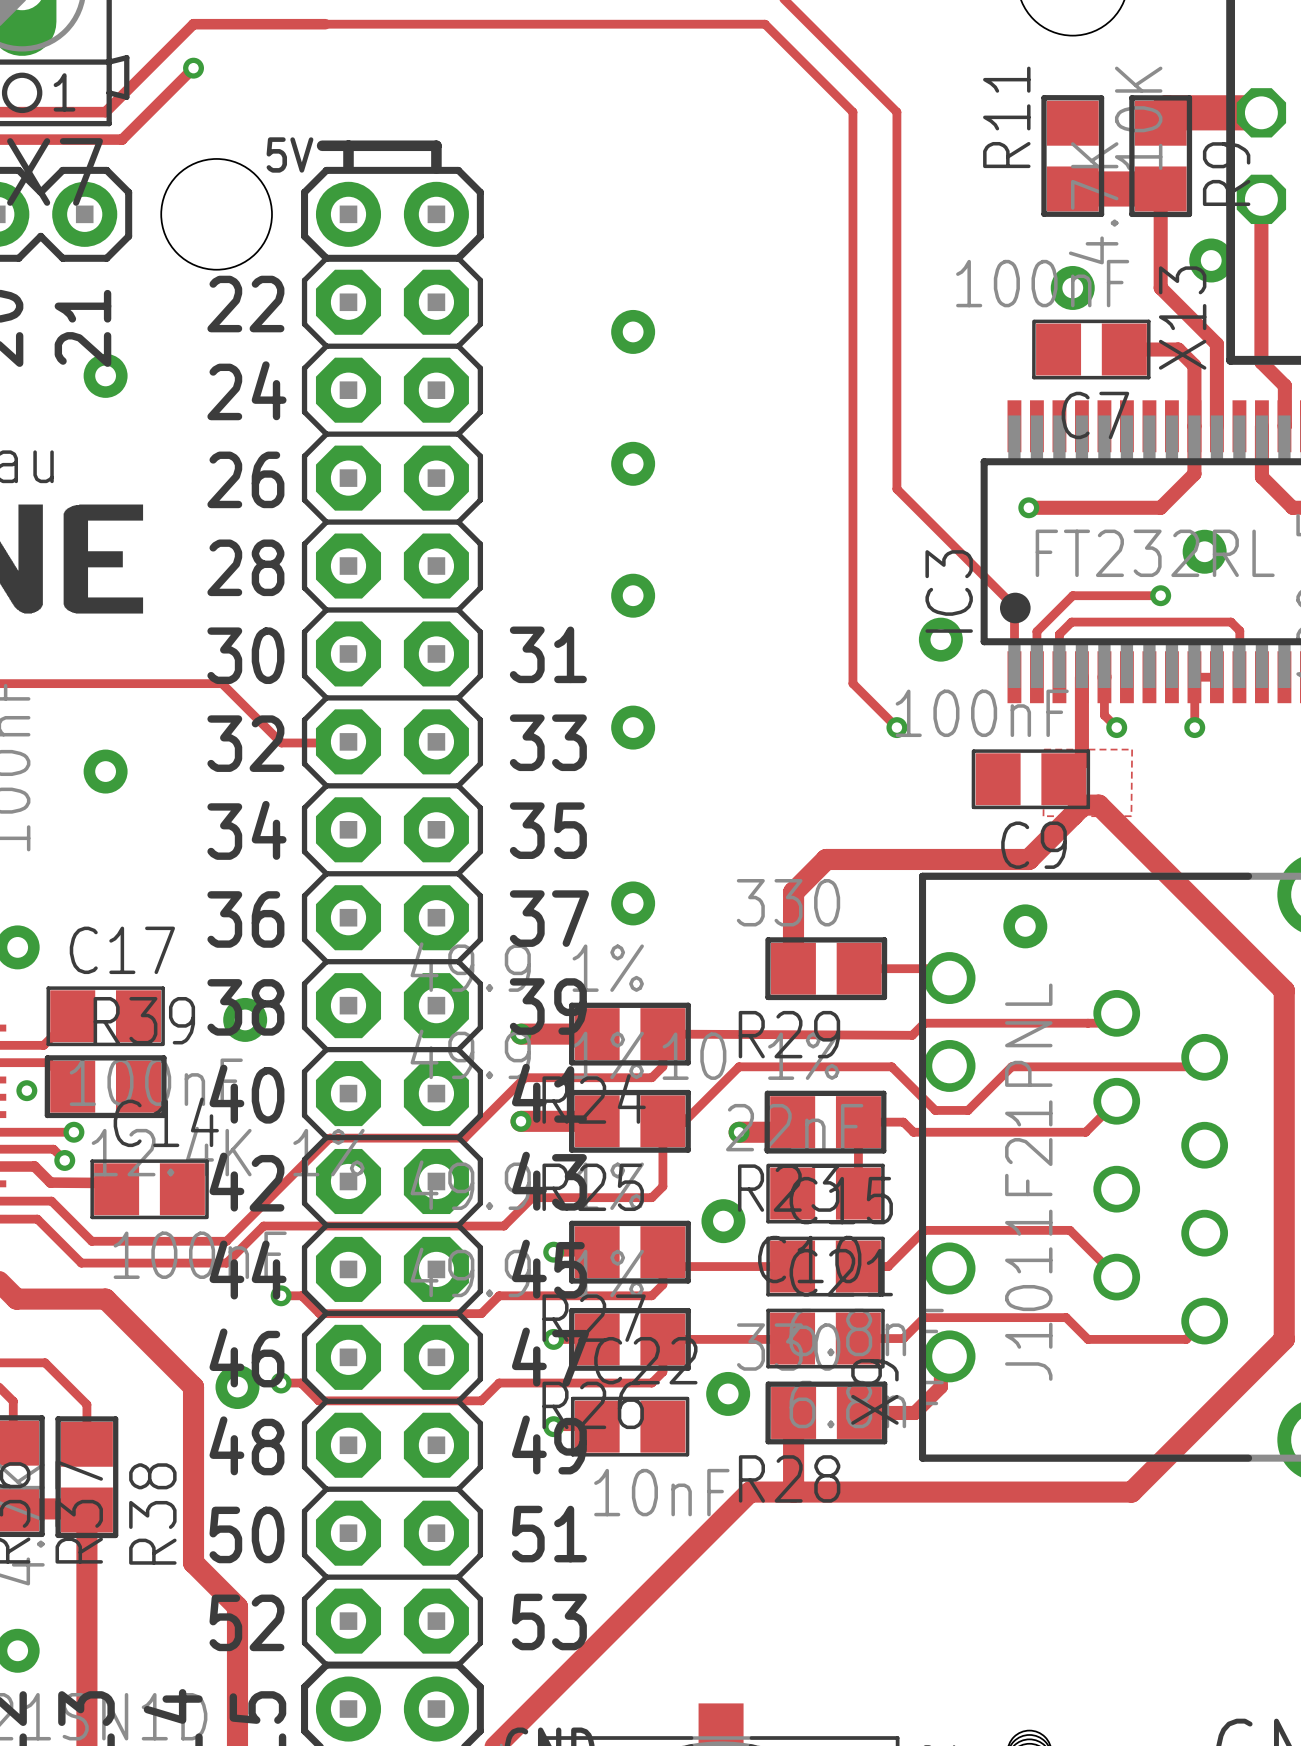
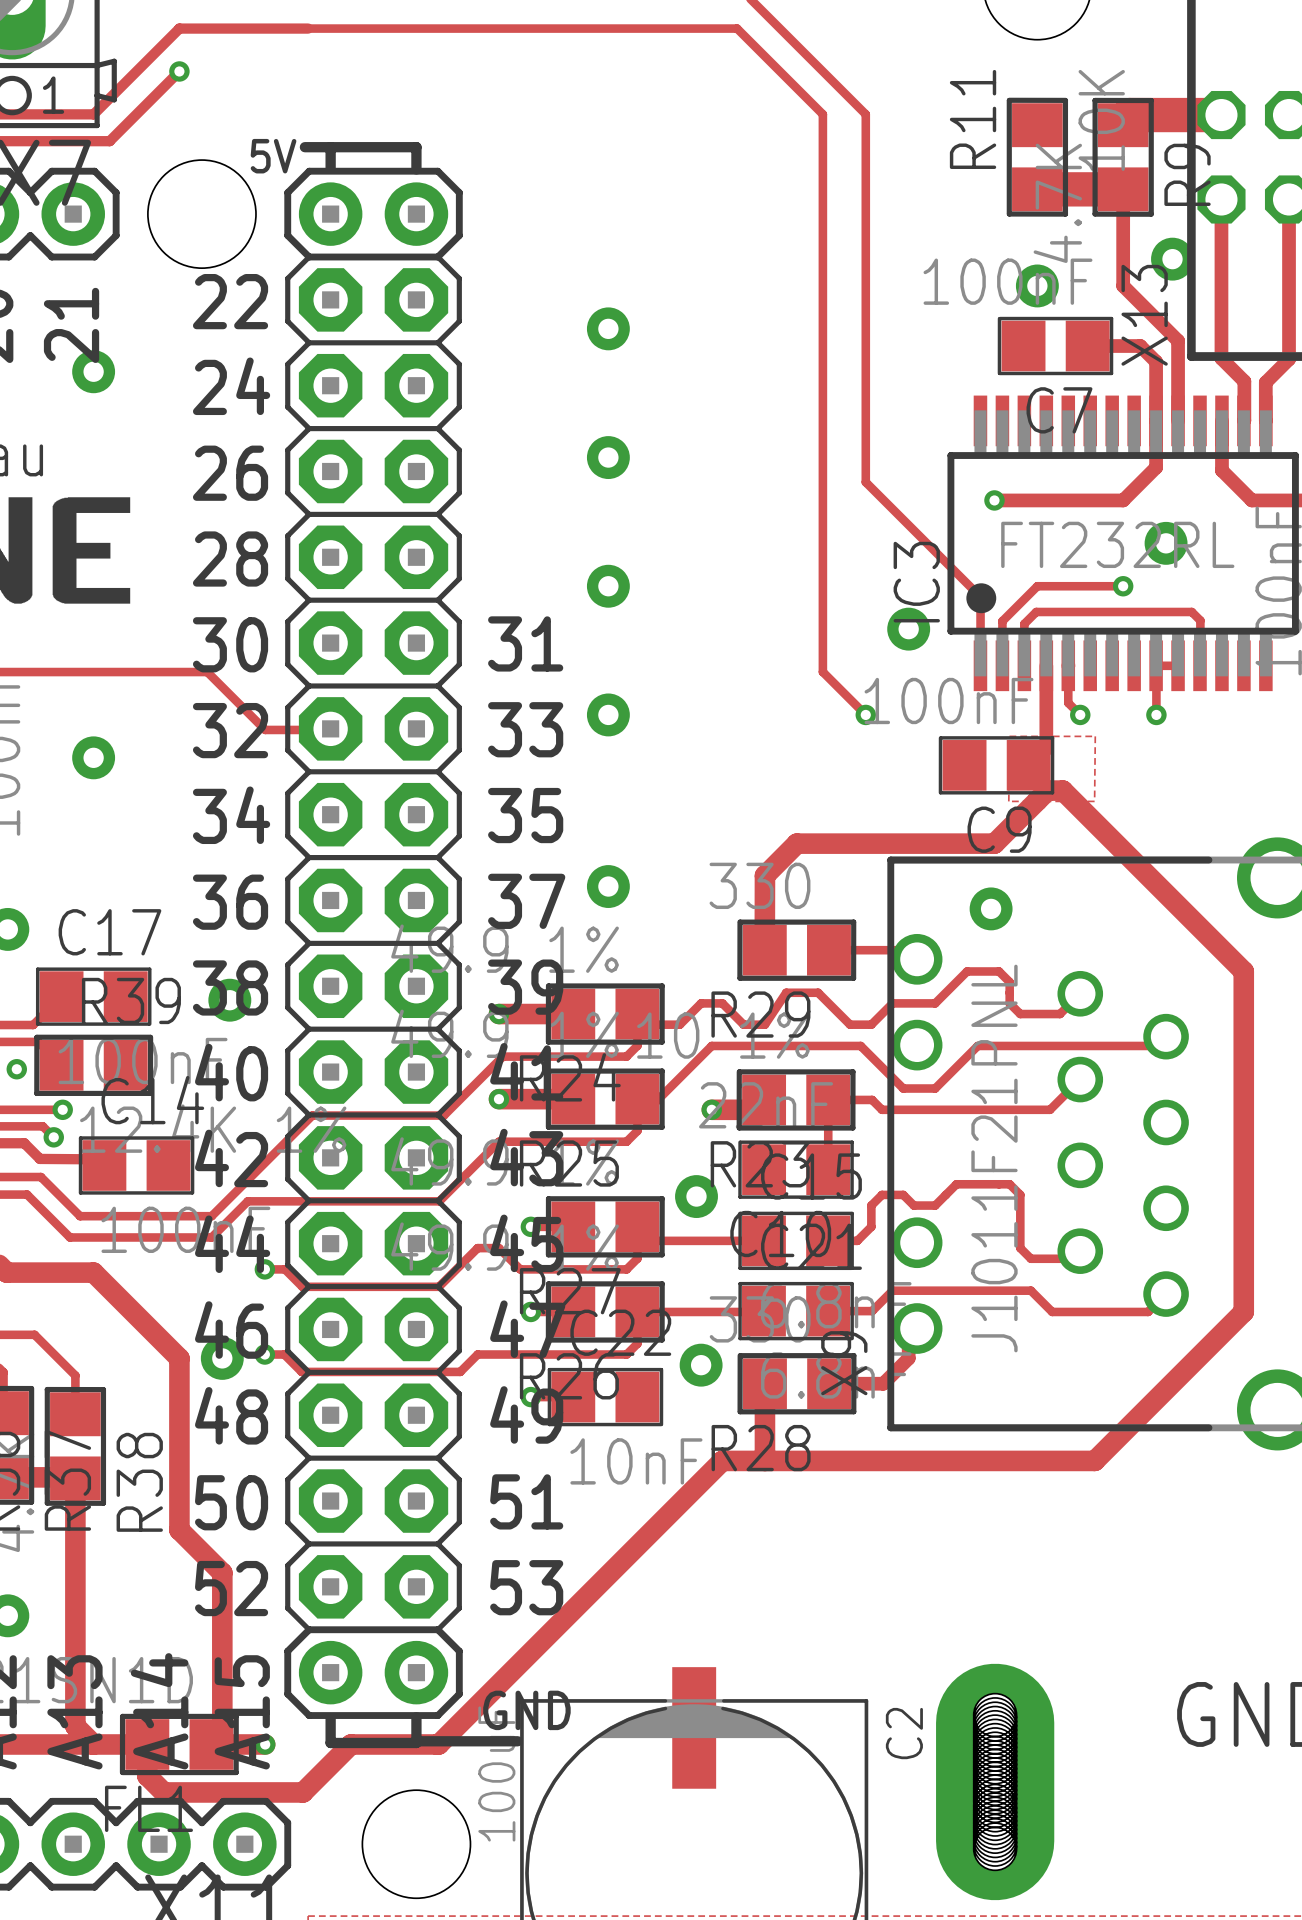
track: (968, 1023) (1106, 1023) -> (935, 1003) (967, 971) (999, 971) (1009, 982) (1009, 1003) (1020, 1014) (1060, 1014) (1070, 1003)
track: (662, 1034) (912, 1035) -> (637, 1014) (648, 1024) (679, 1024) (701, 1003) (722, 1003) (743, 1024) (764, 1024) (786, 992) (818, 992) (850, 1024) (871, 1024) (880, 1015)
track: (662, 1153) (662, 1186) (651, 1197) (532, 1197) (504, 1226) (460, 1226) -> (637, 1130) (626, 1141) (498, 1141) (439, 1200)
track: (946, 1230) (924, 1230) (902, 1252) -> (913, 1205) (903, 1194) (881, 1194) (871, 1205) (871, 1226)
track: (968, 1230) (1069, 1230) (1116, 1277) -> (935, 1205) (956, 1184) (1009, 1184) (1020, 1194) (1020, 1248) (1030, 1258) (1072, 1258) (1080, 1251)
track: (542, 1295) (499, 1295) (481, 1313) (459, 1313) -> (520, 1269) (498, 1248) (477, 1248) (439, 1286)

